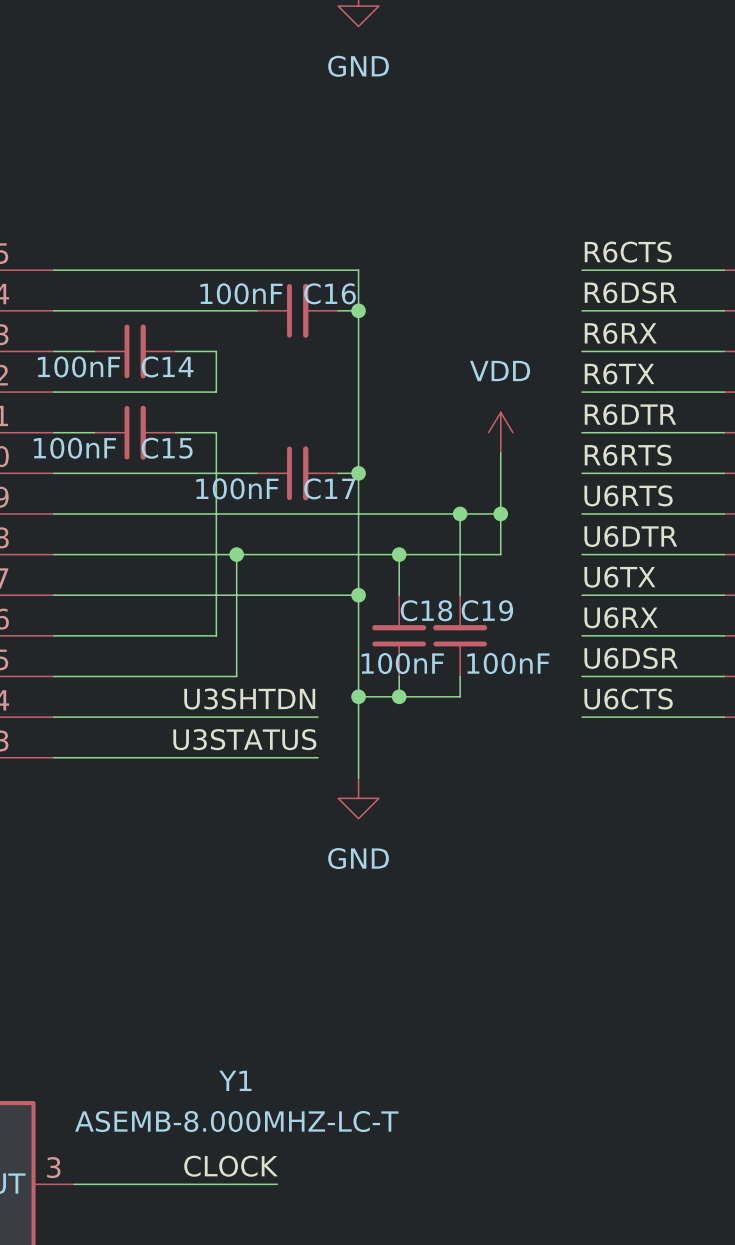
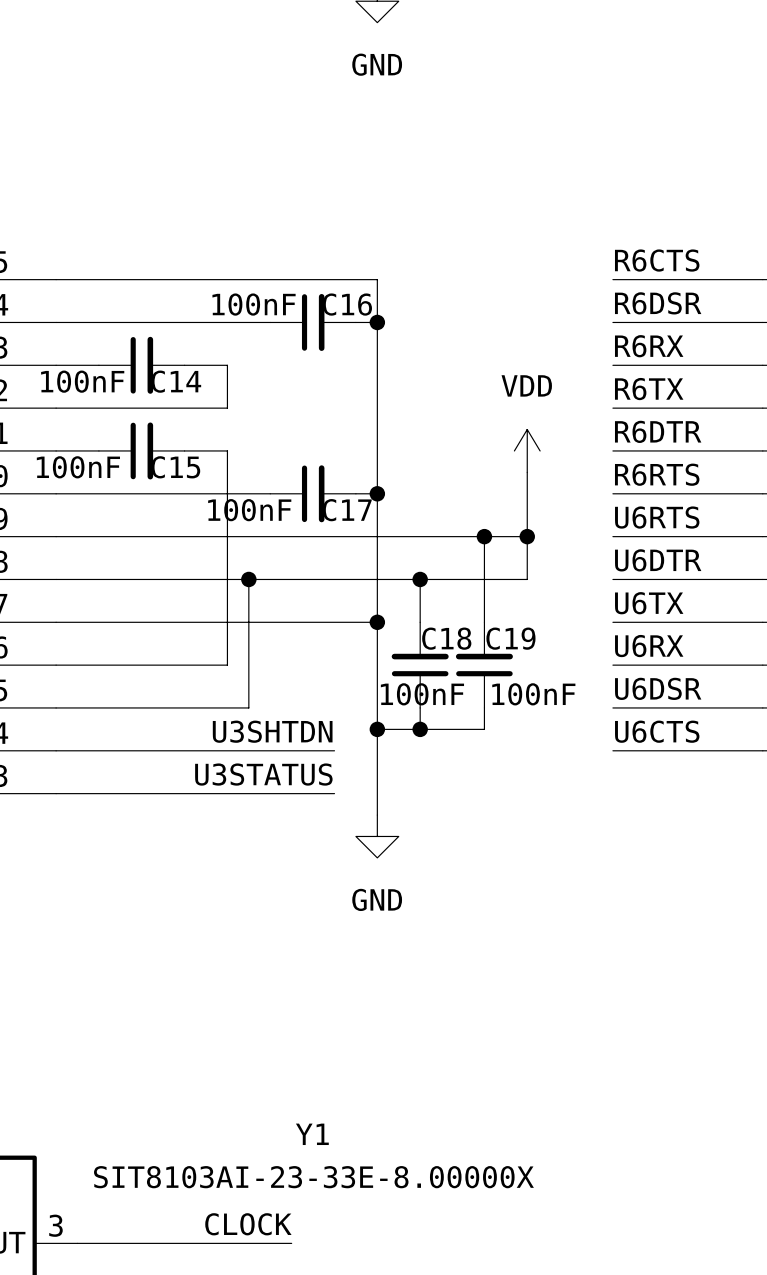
Y1 name position: Y1 (235, 1080) -> Y1 (312, 1134)
Y1 value: ASEMB-8.000MHZ-LC-T (236, 1121) -> SIT8103AI-23-33E-8.00000X (313, 1177)

